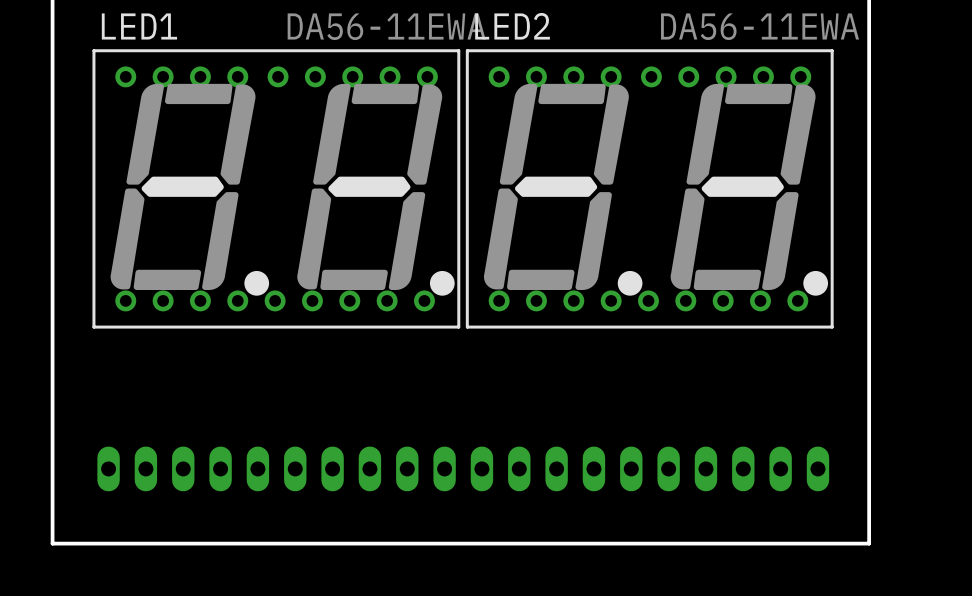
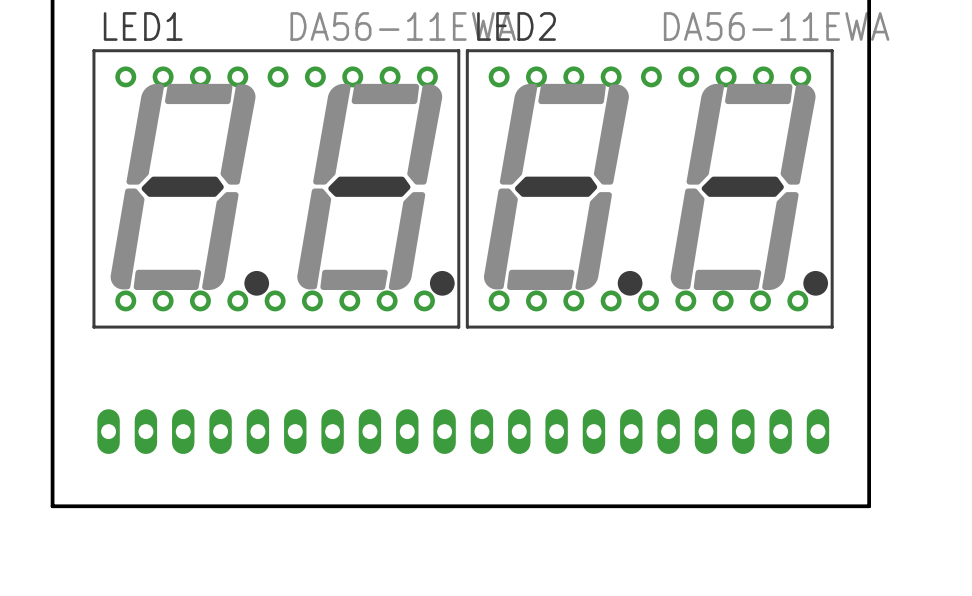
part position: (463, 468) -> (463, 431)
board edge: (52, 506) (52, 543) (869, 543) (869, 506) -> (52, 506) (869, 506)

